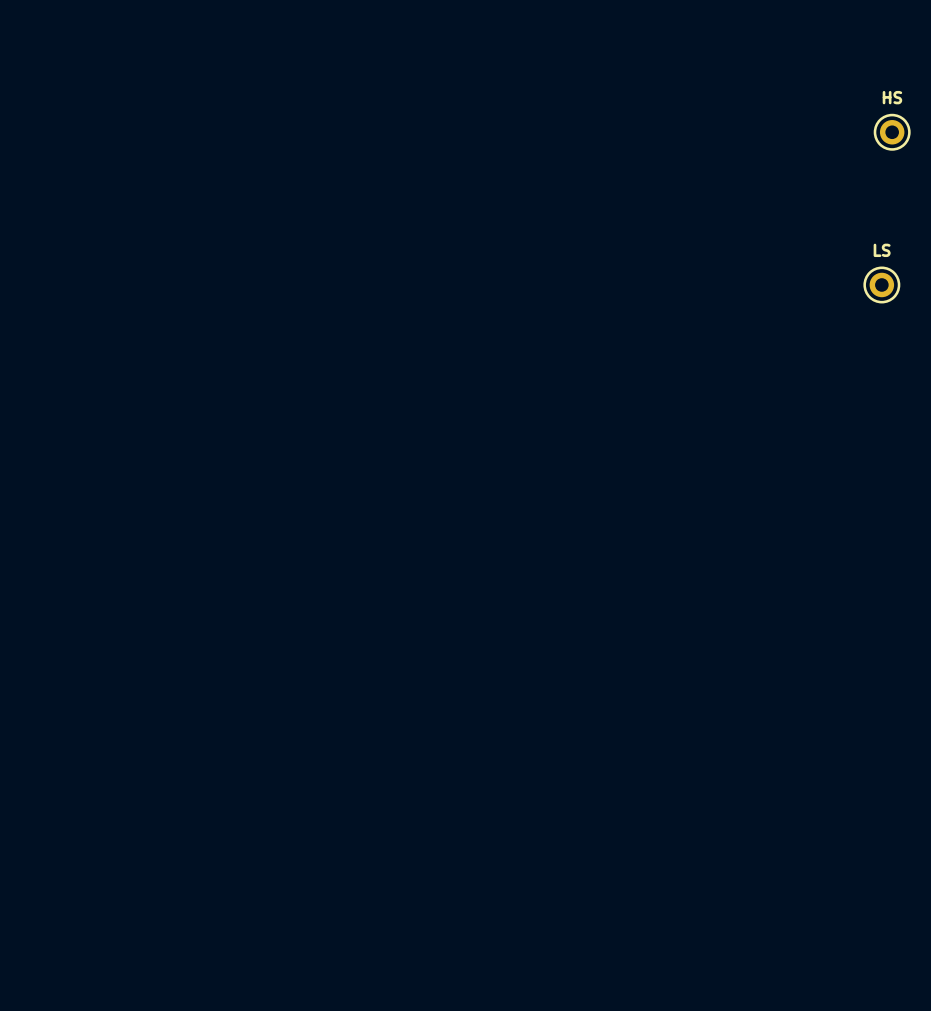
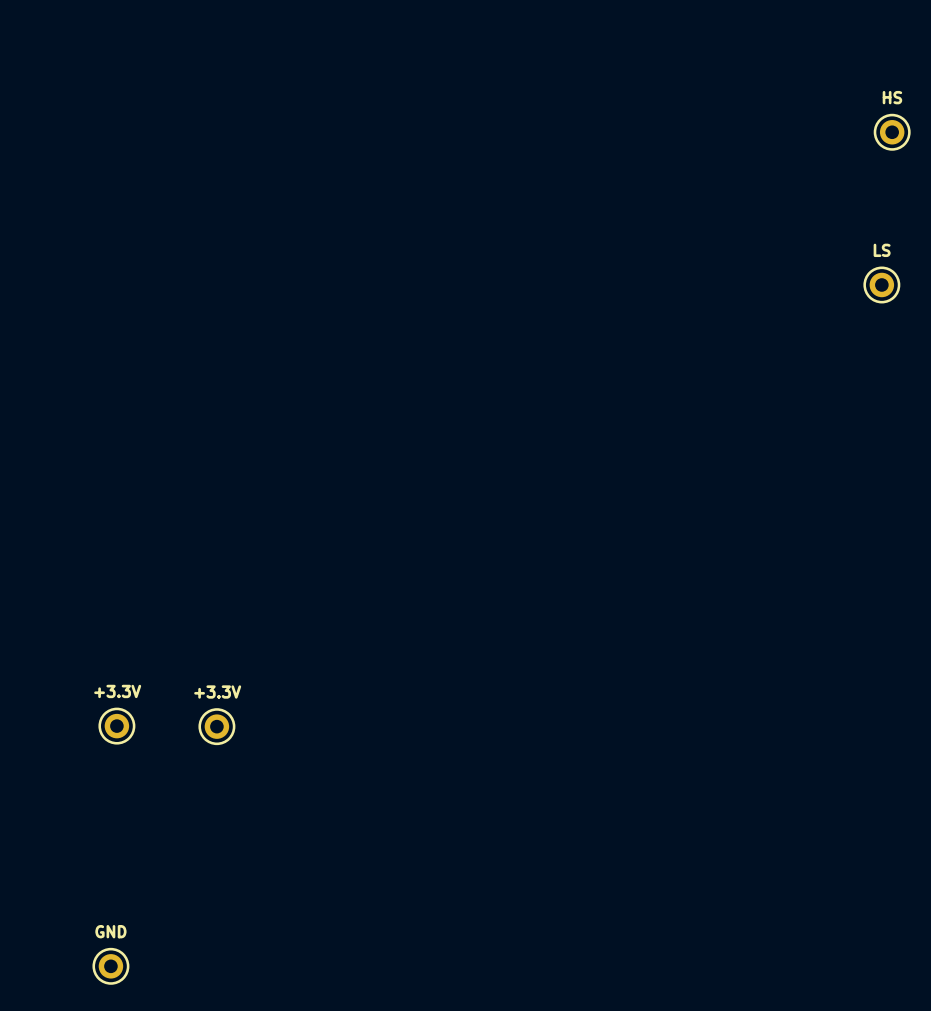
+3.3V: none -> (116, 726)
+3.3V: none -> (216, 726)
GND: none -> (110, 966)

